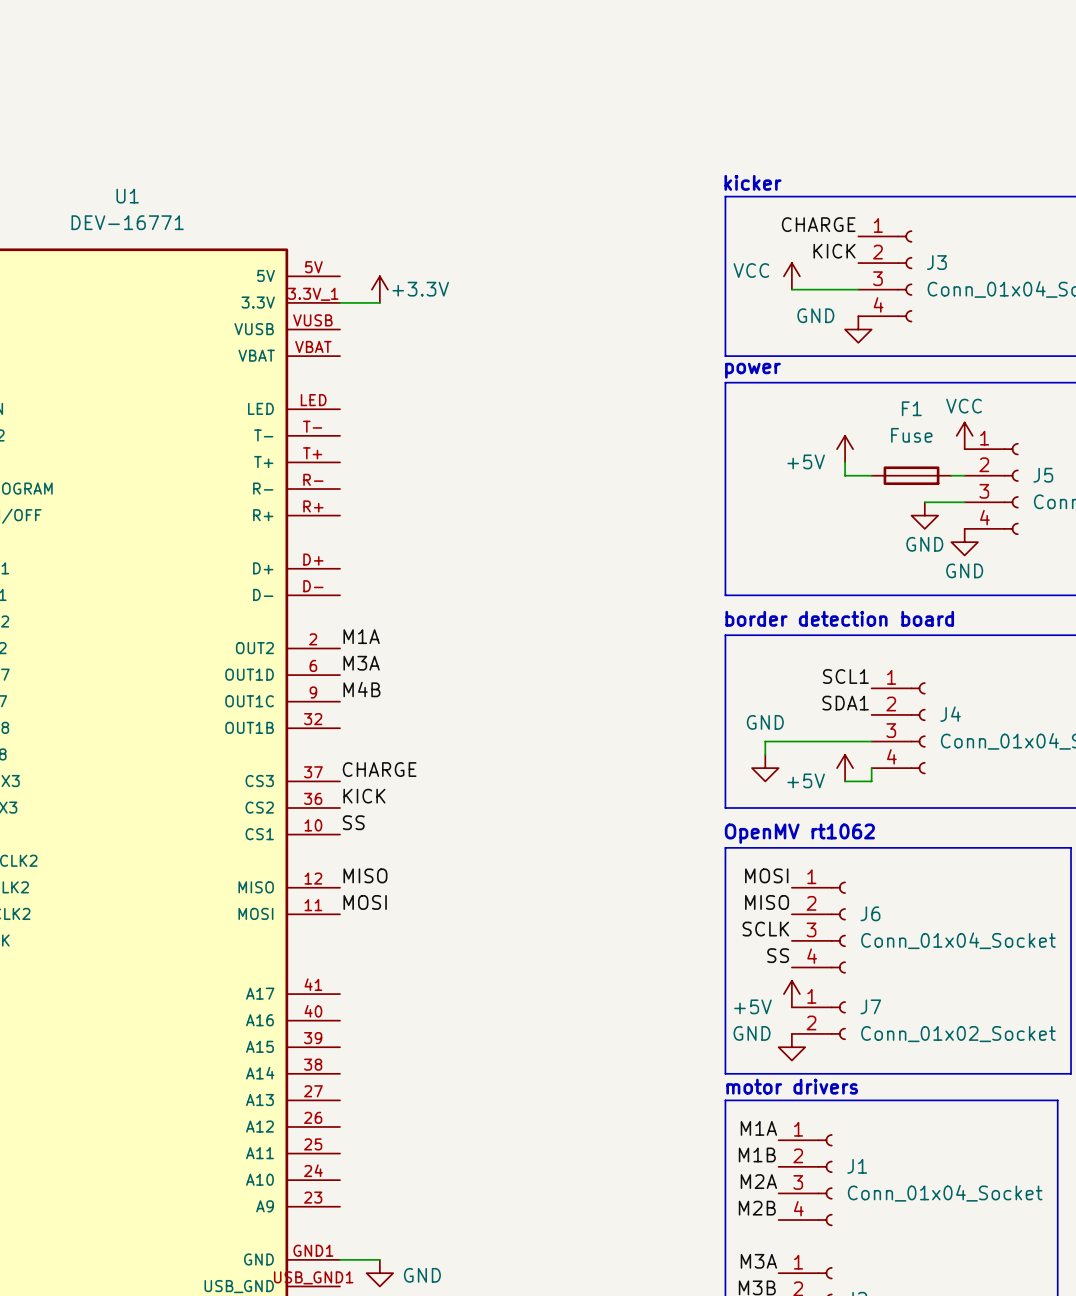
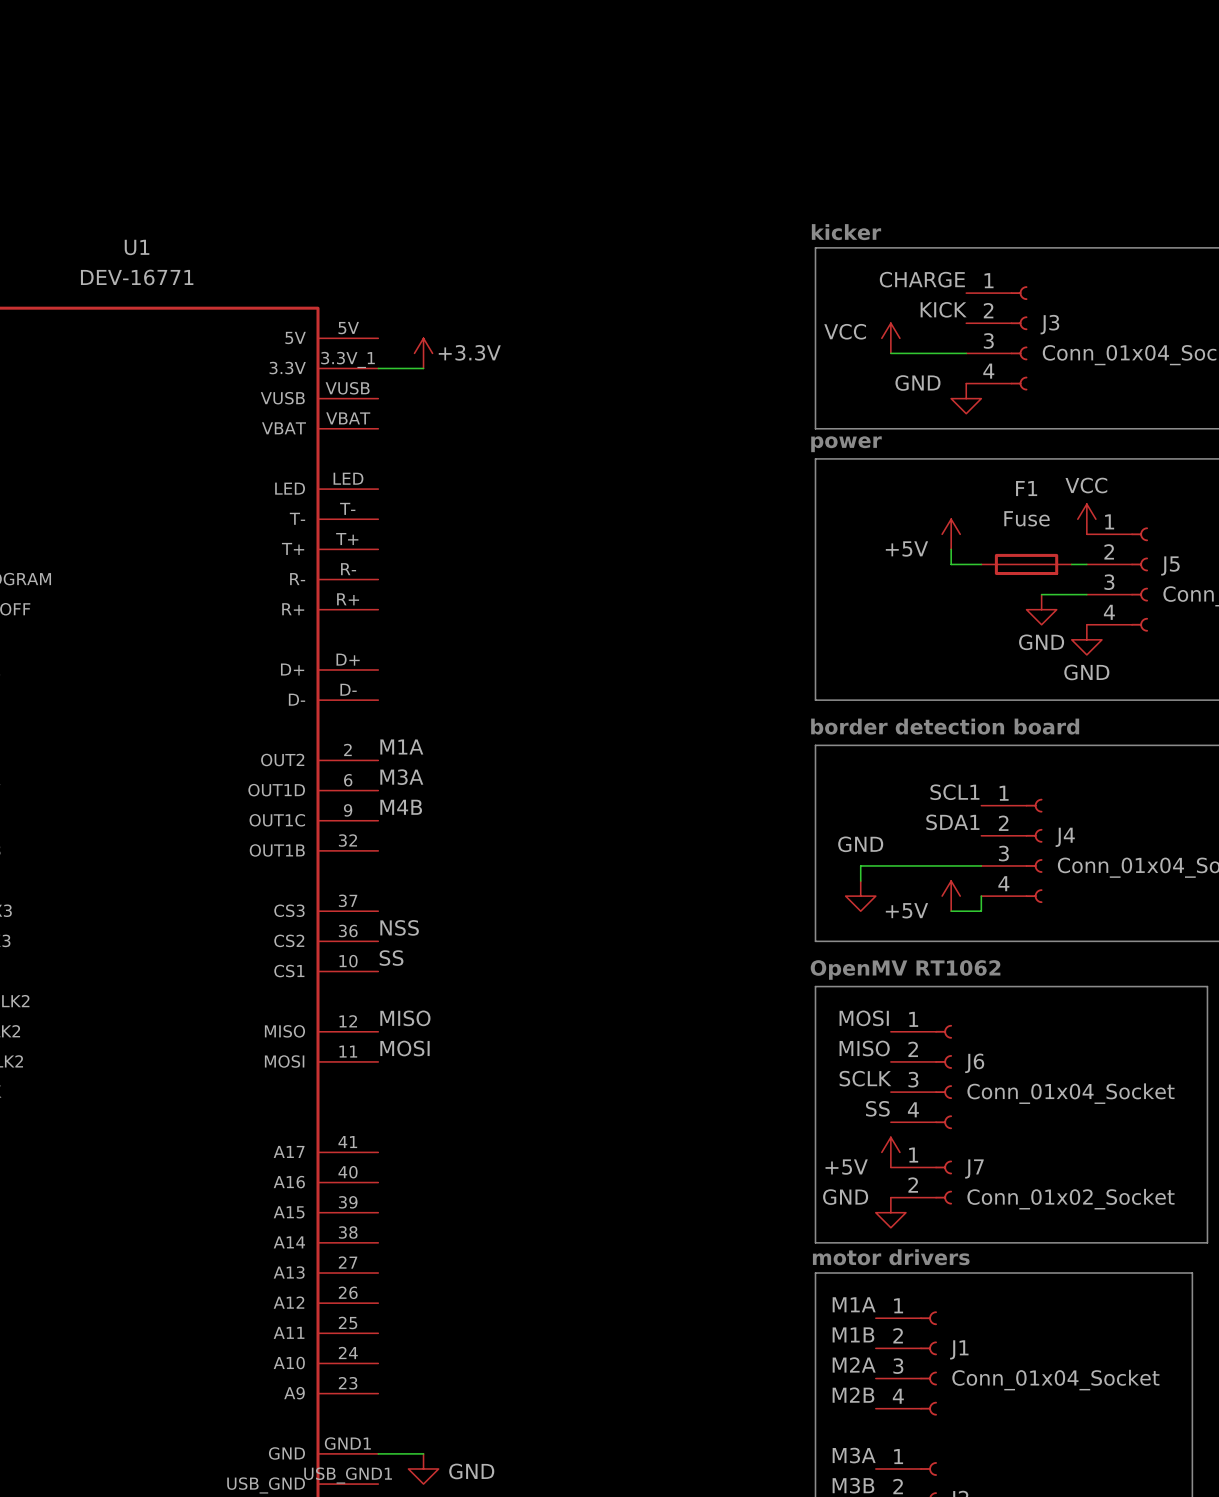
label: CHARGE (379, 769) -> none
label: KICK (364, 796) -> NSS (399, 927)
text: OpenMV rt1062 (799, 833) -> OpenMV RT1062 (905, 969)

